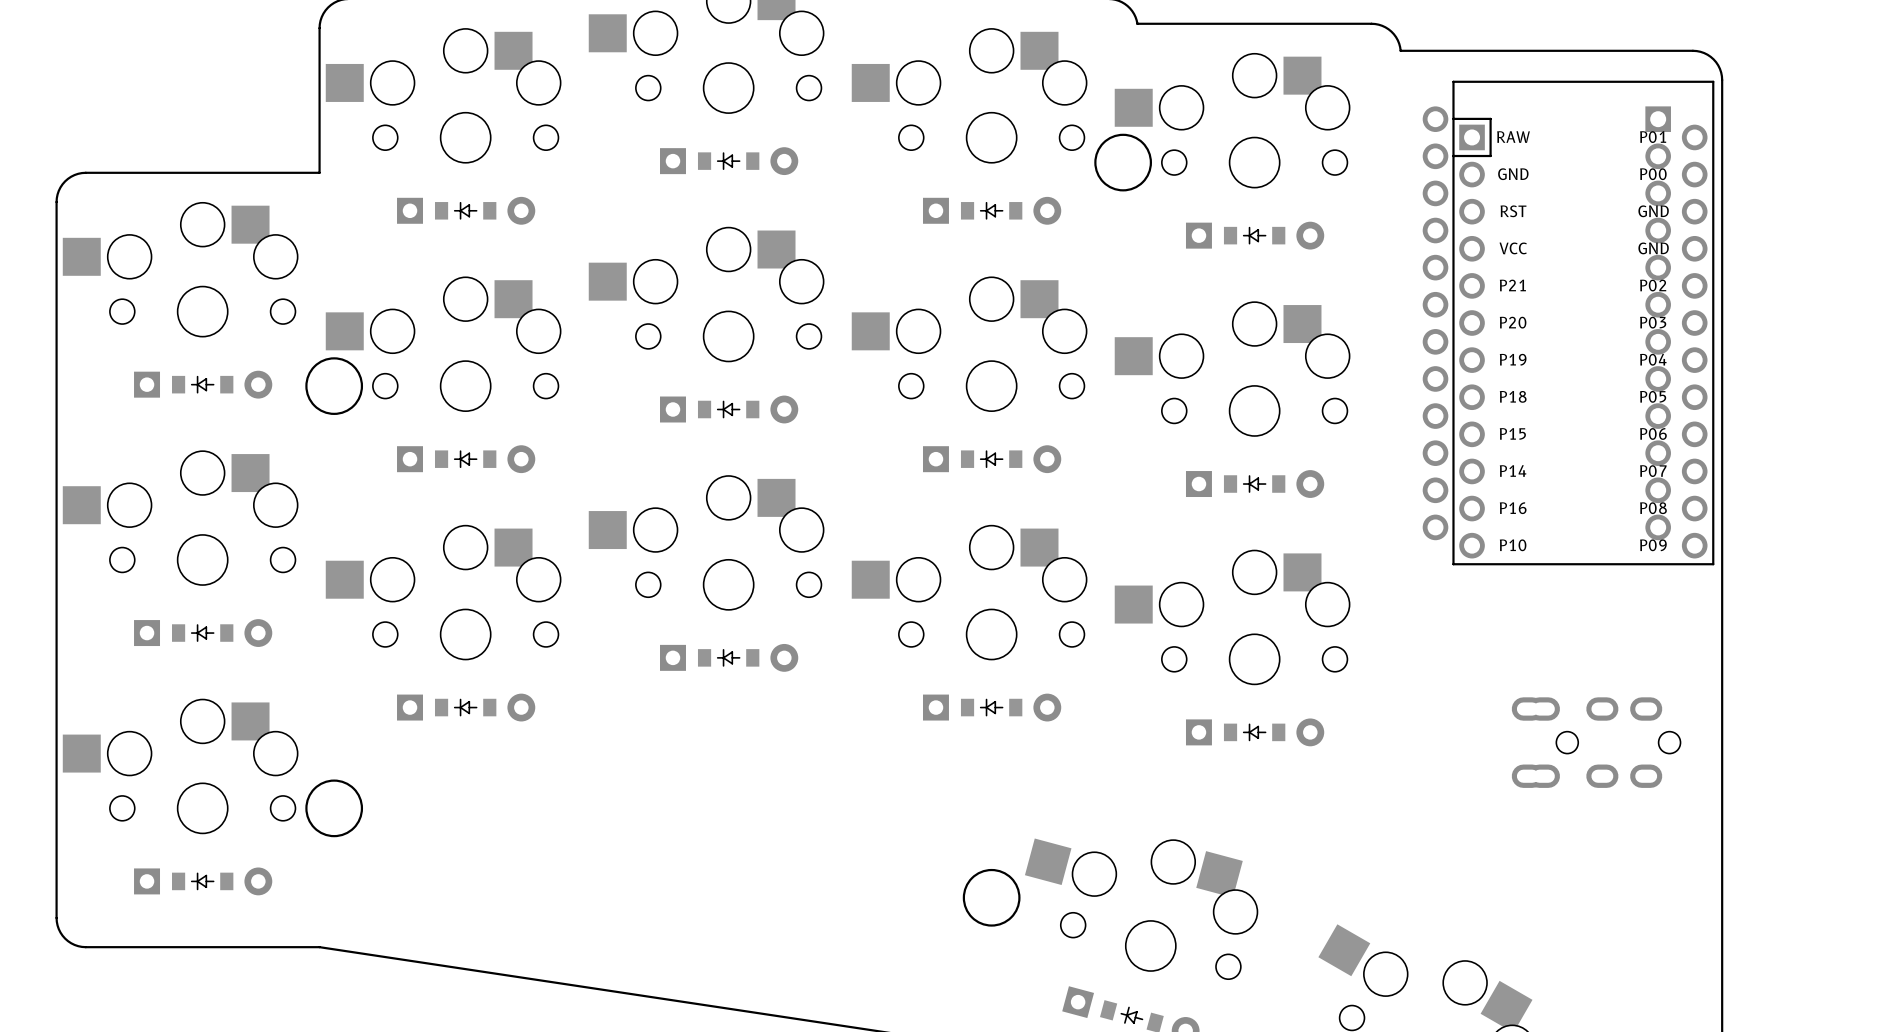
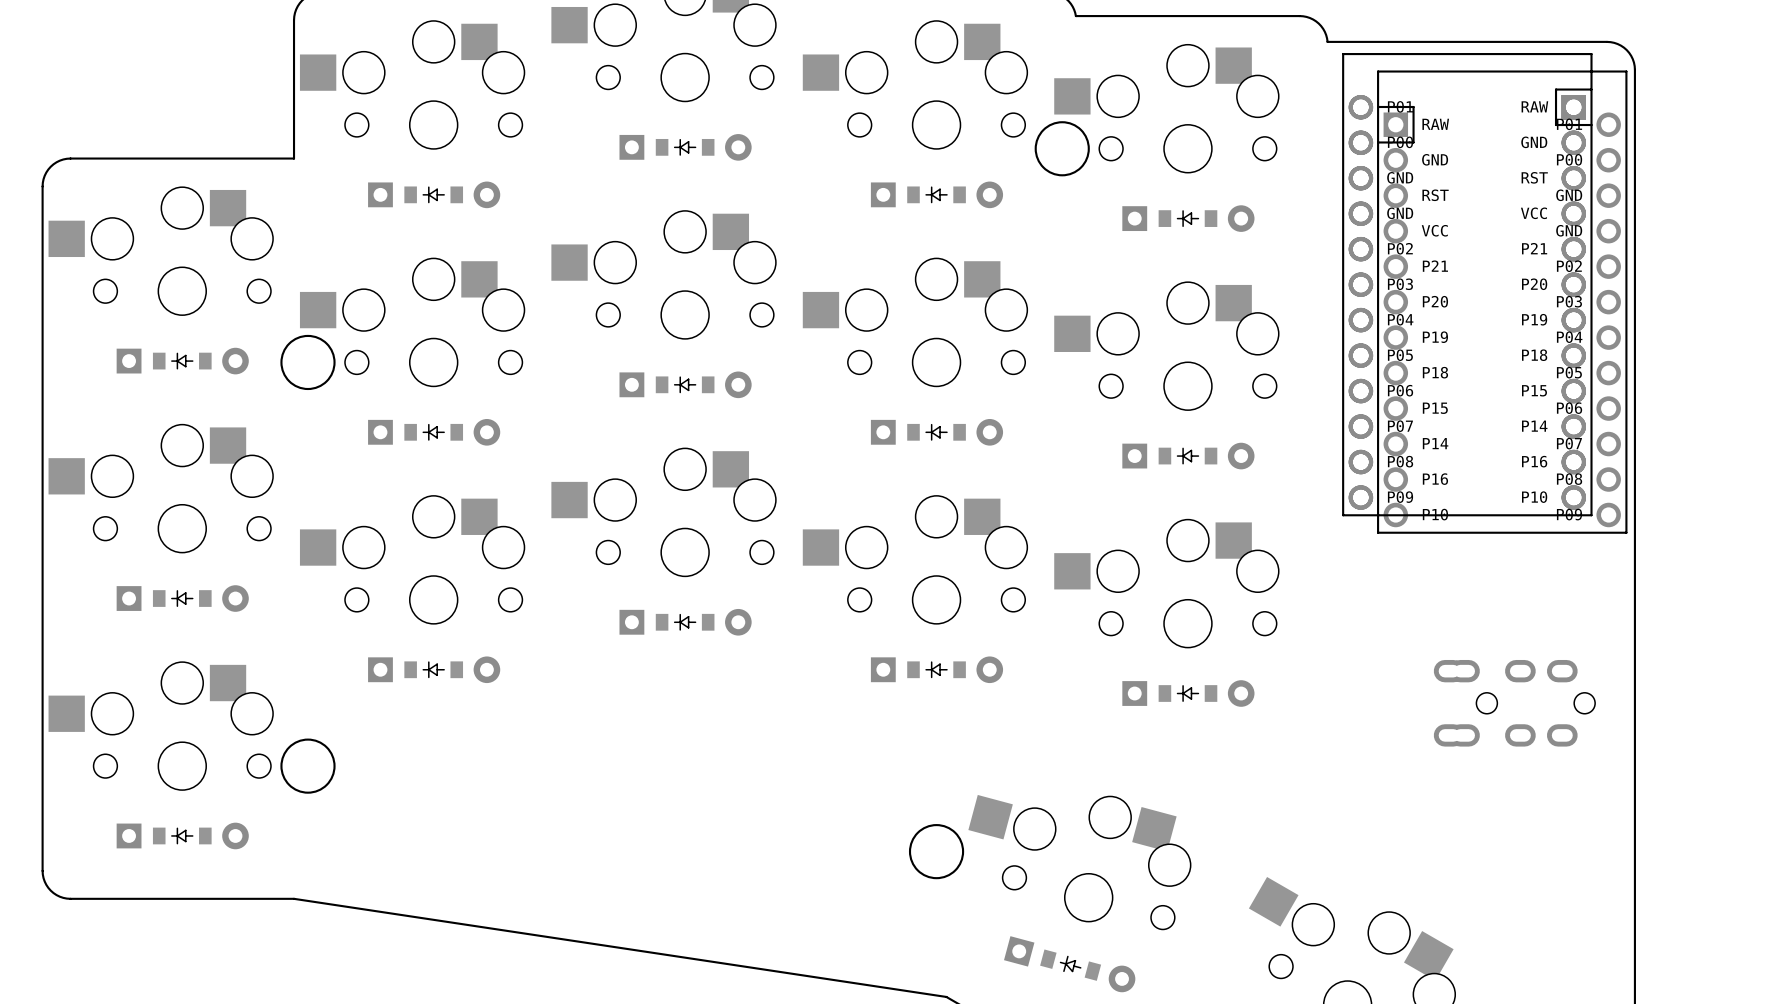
part: none -> (1467, 284)

